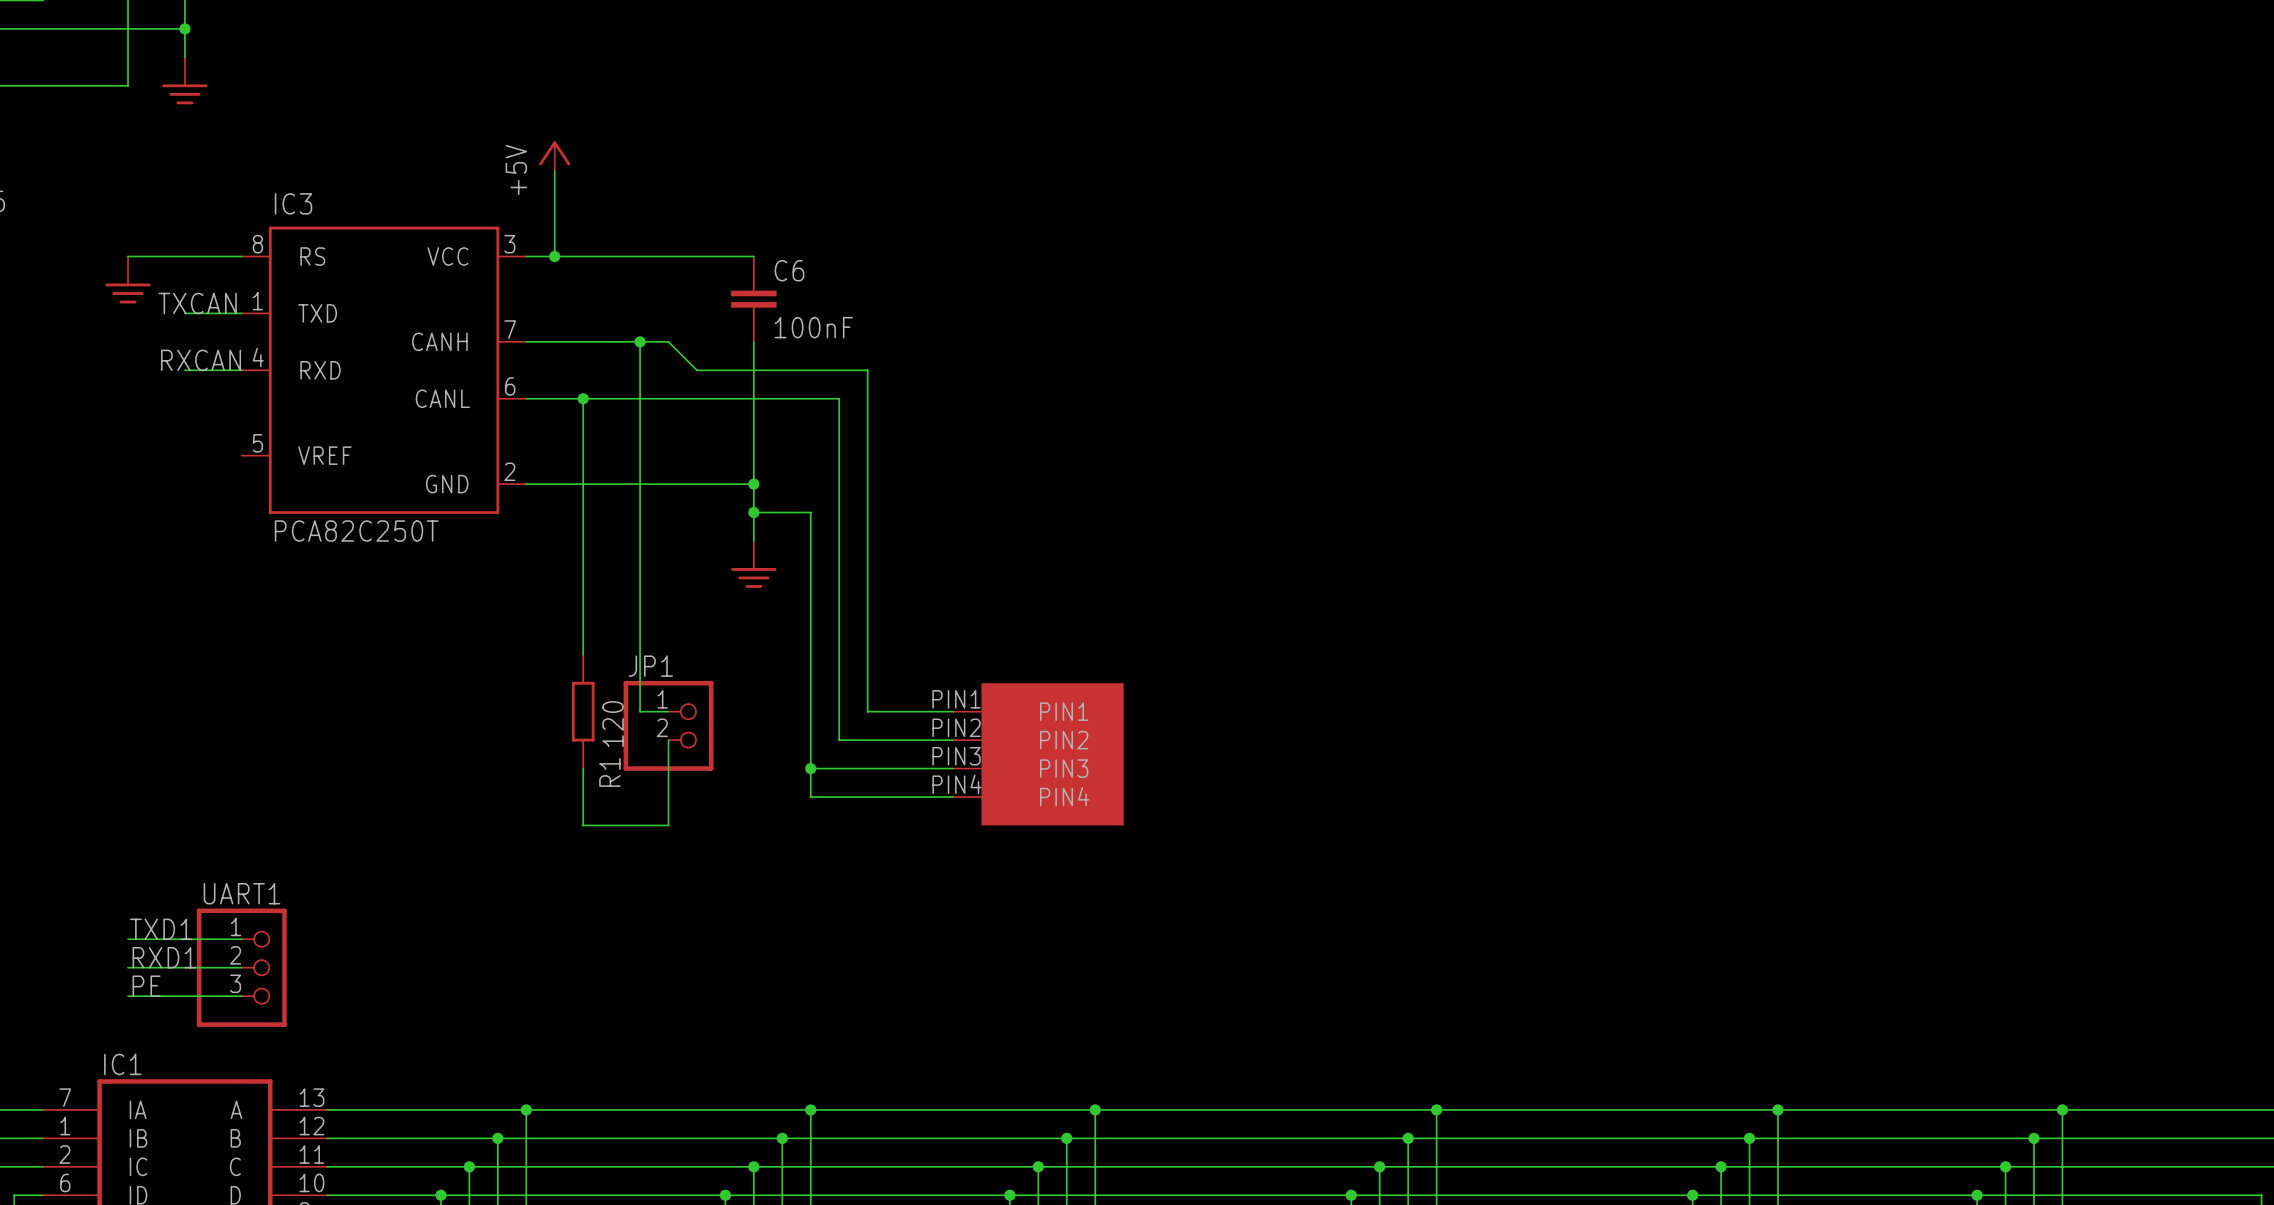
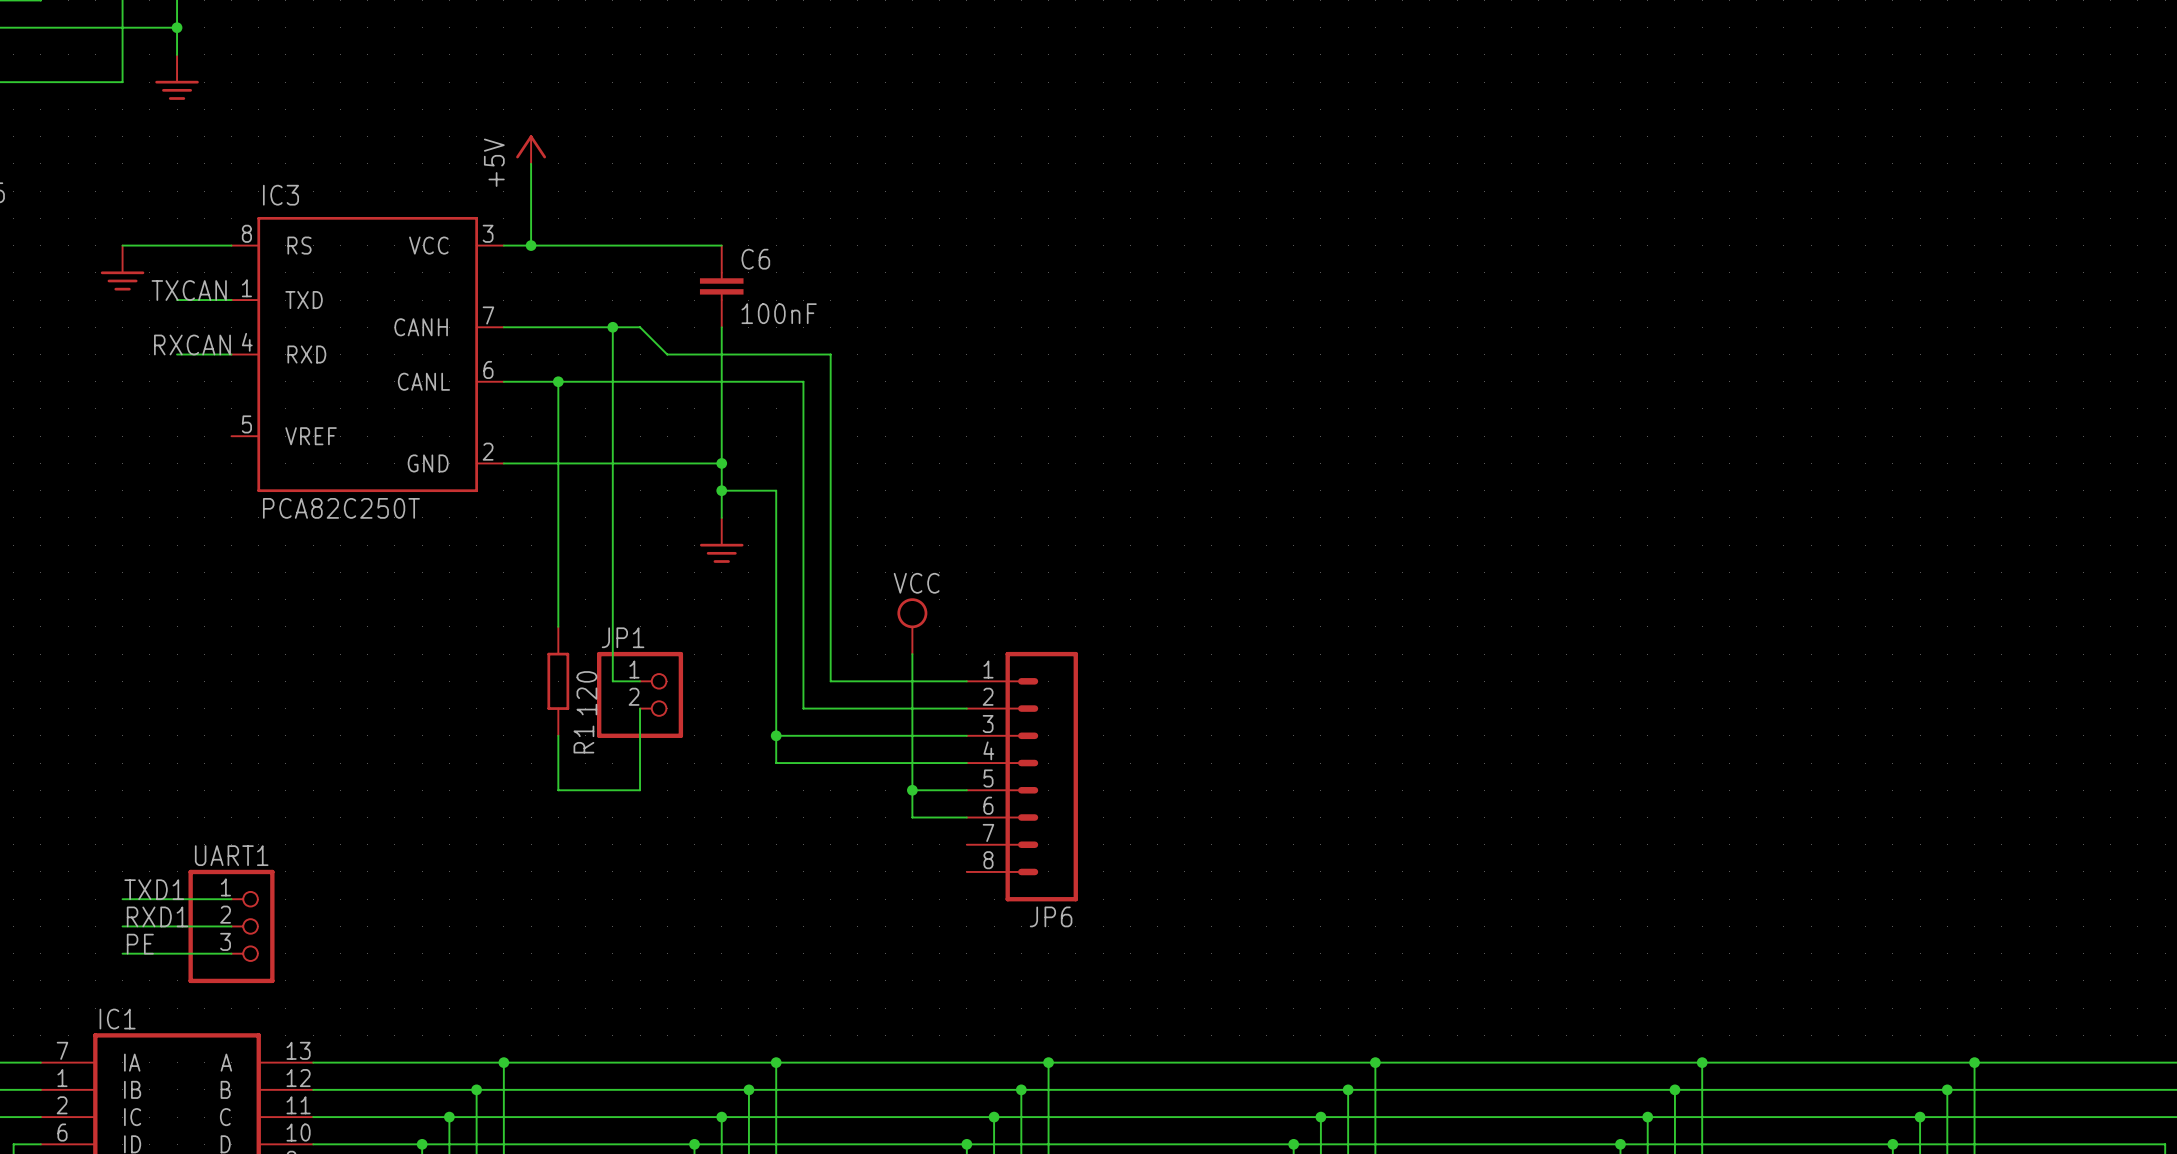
power symbol: none -> VCC (912, 626)
wire: none -> (912, 654) (912, 817) (966, 817)
part: (1038, 754) -> none
JP6: none -> (1022, 776)
wire: none -> (912, 790) (966, 790)
junction: none -> (912, 790)

